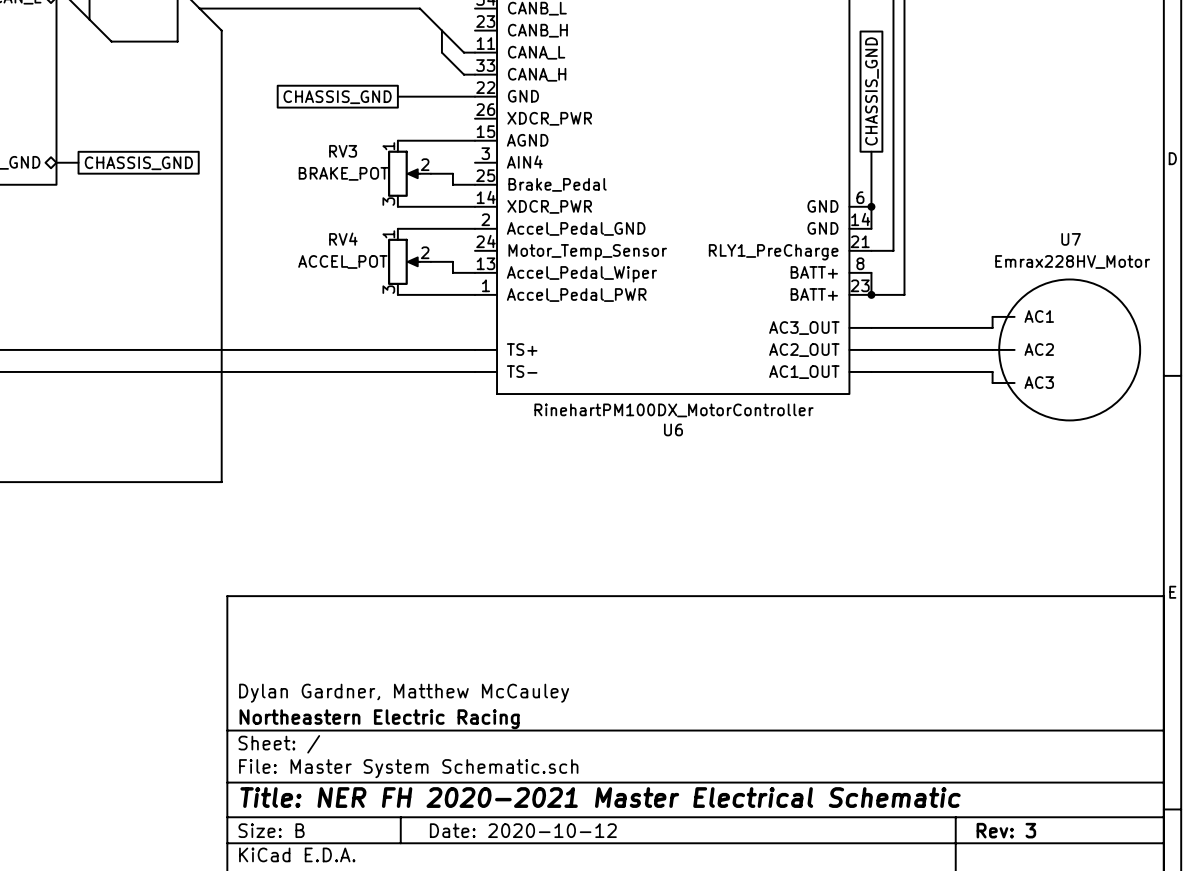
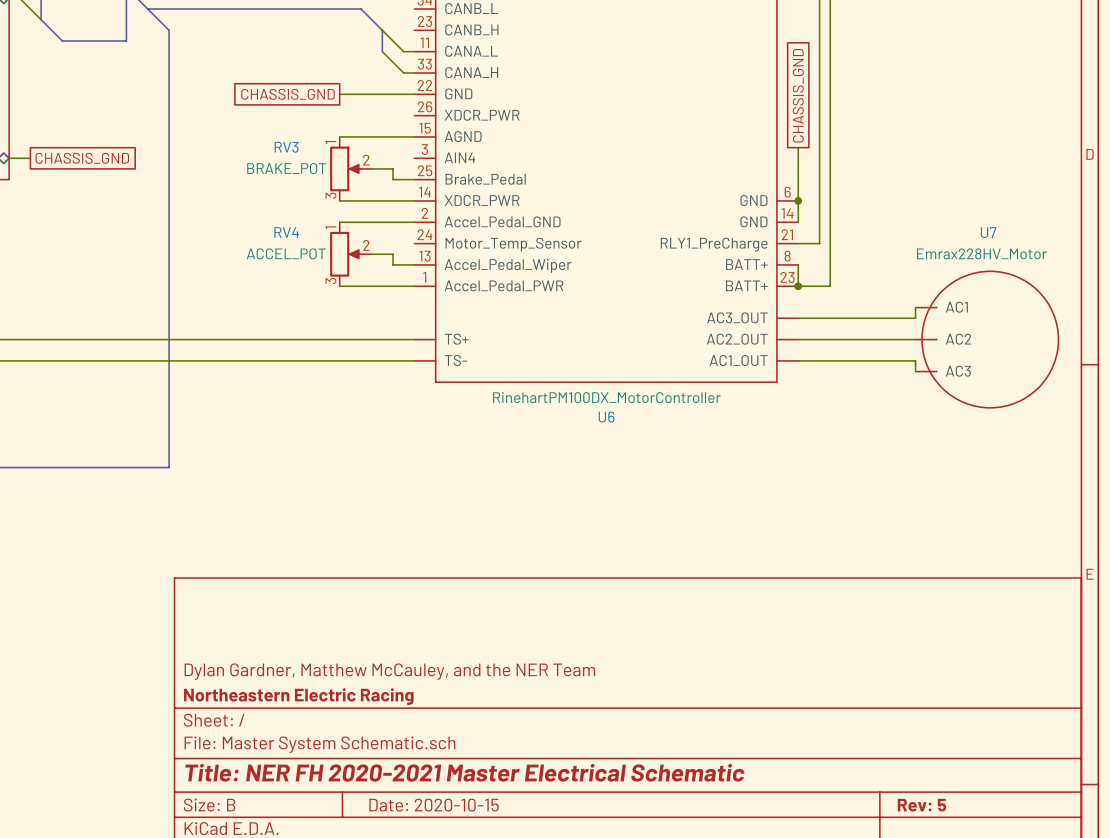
title block: Dylan Gardner, Matthew McCauley (404, 693) -> Dylan Gardner, Matthew McCauley, and the NER Team (389, 671)
title block: Date: 2020-10-12 (523, 830) -> Date: 2020-10-15 (434, 805)
title block: Rev: 3 (1006, 830) -> Rev: 5 (921, 805)

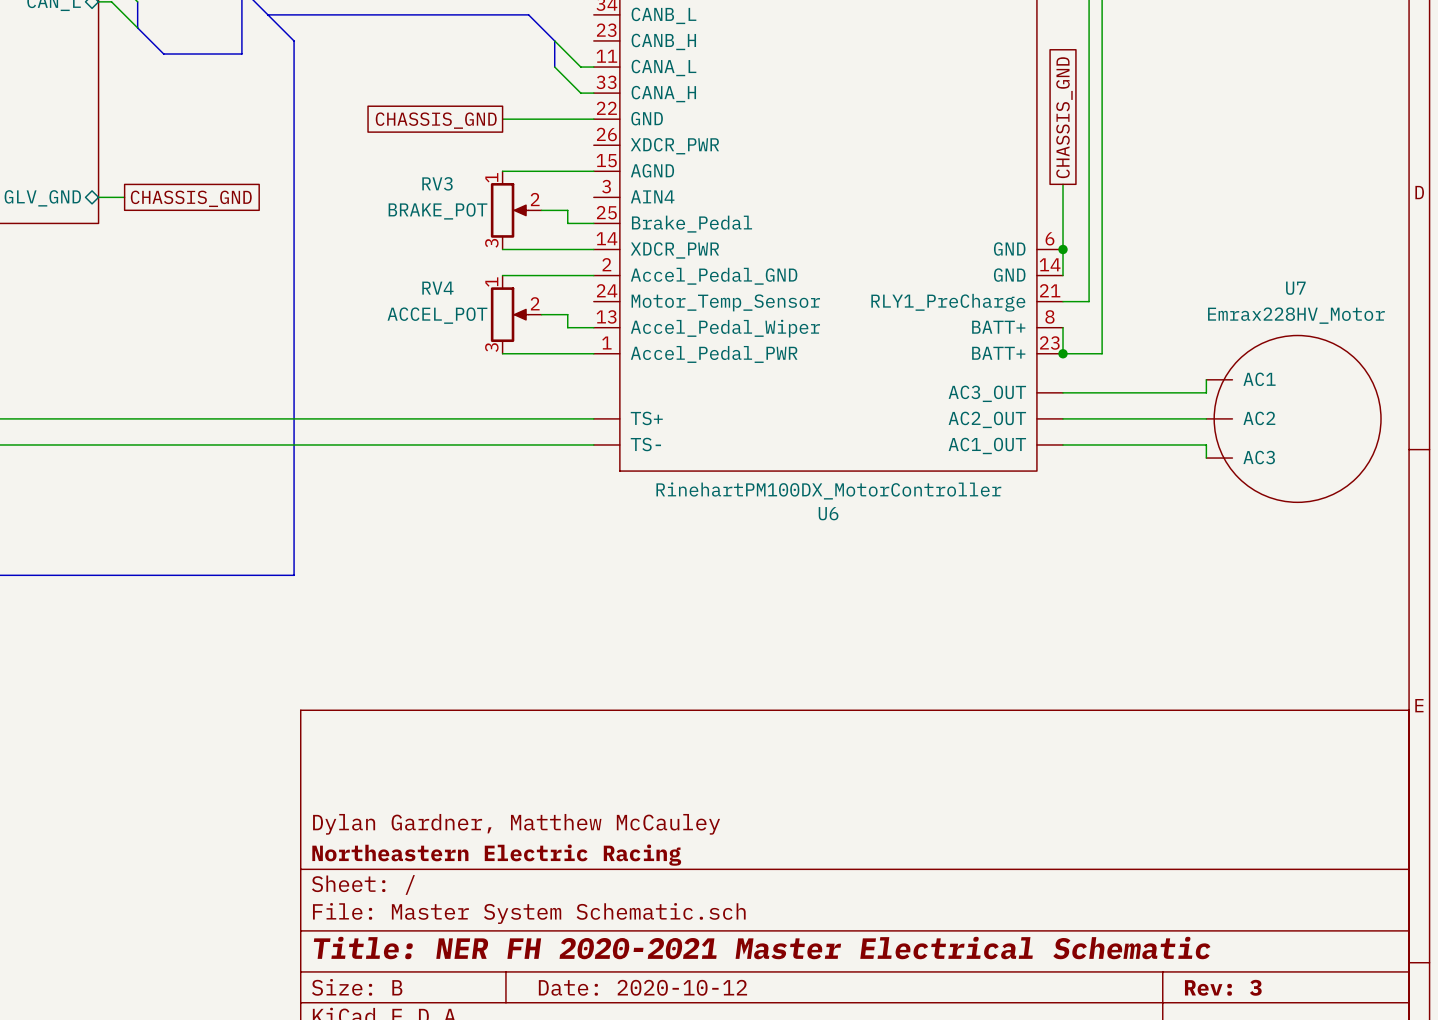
title block: Dylan Gardner, Matthew McCauley, and the NER Team (389, 671) -> Dylan Gardner, Matthew McCauley (516, 824)
title block: Date: 2020-10-15 (434, 805) -> Date: 2020-10-12 (642, 987)
title block: Rev: 5 (921, 805) -> Rev: 3 (1223, 987)

